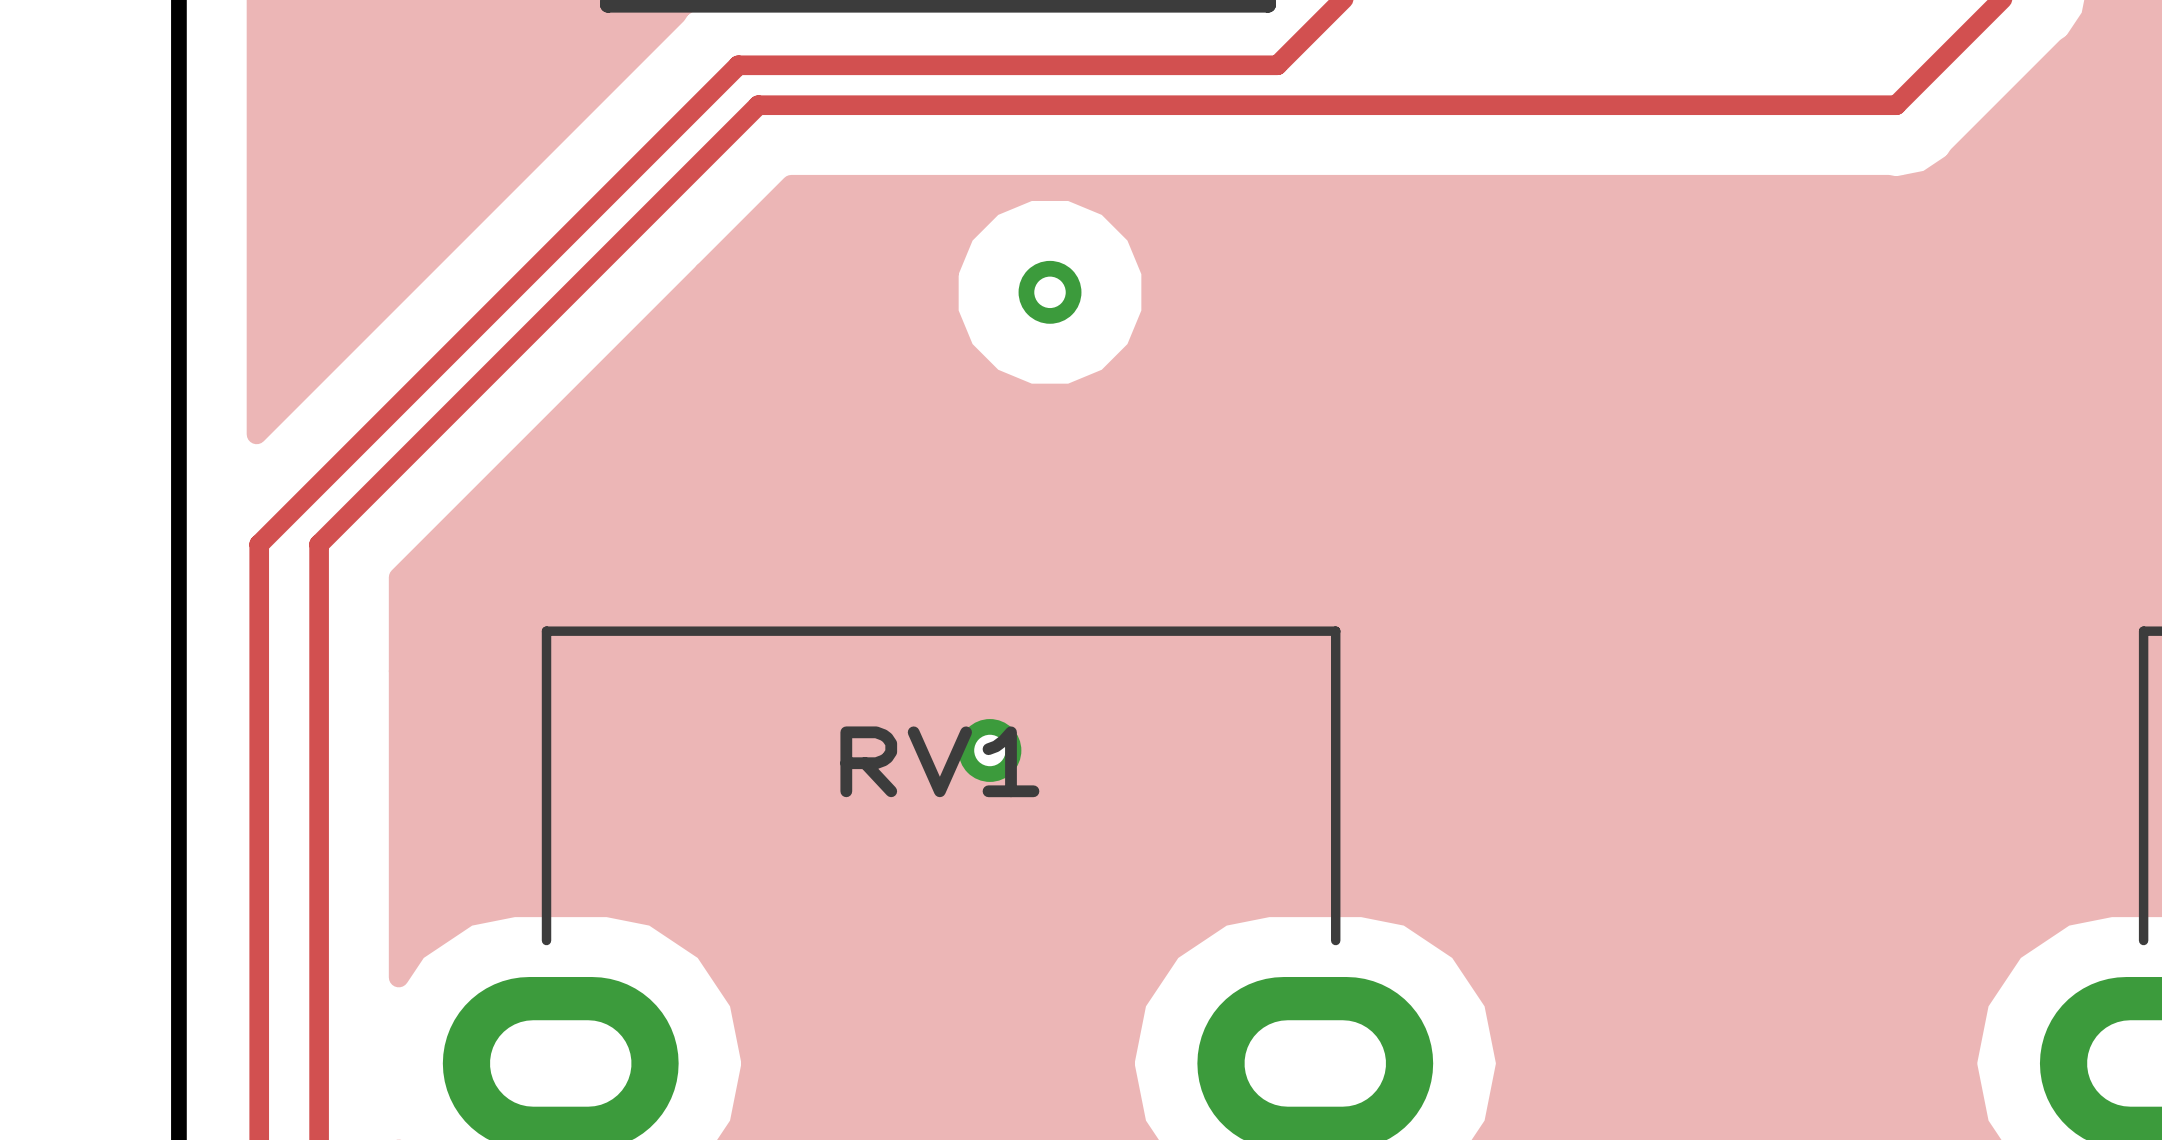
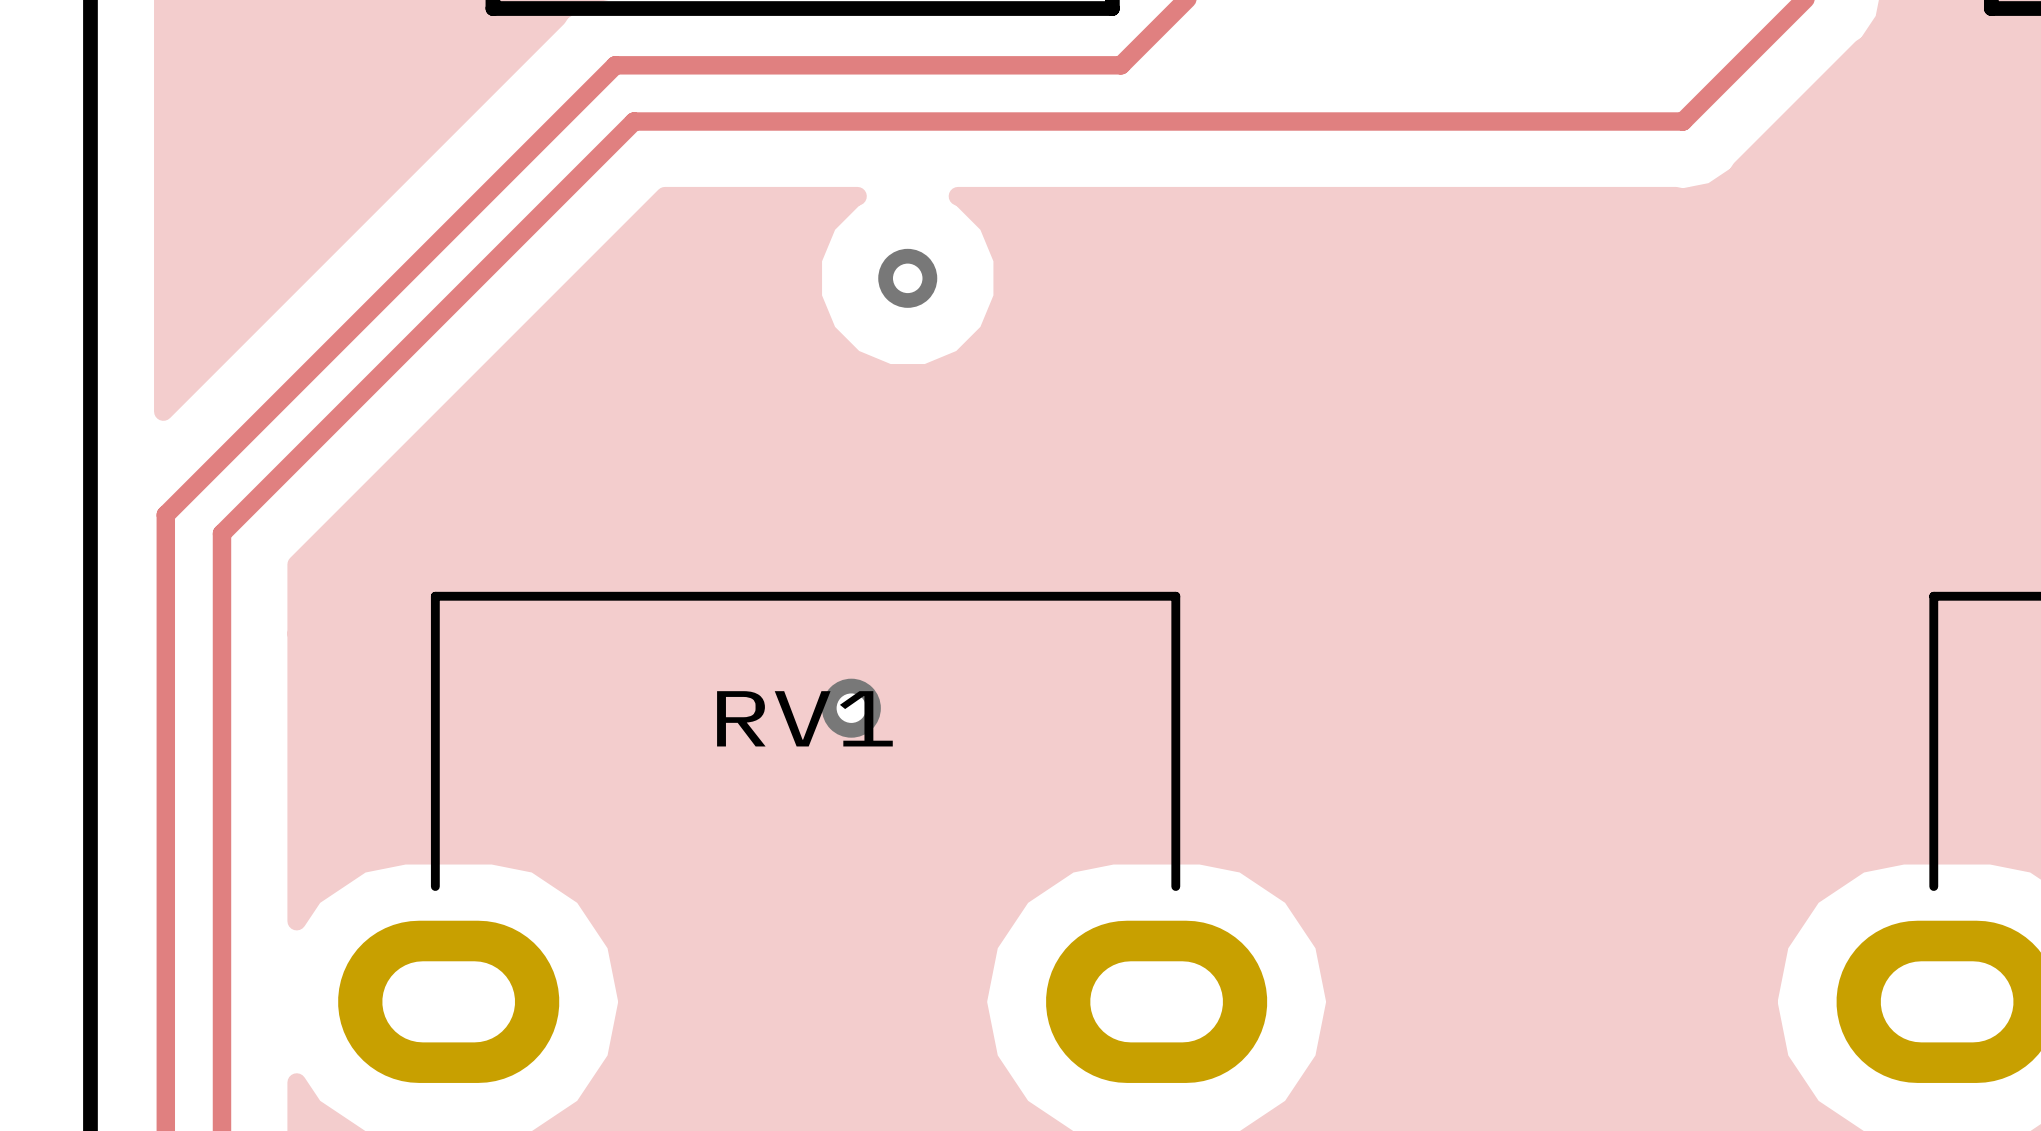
track: (1896, 105) (758, 105) (319, 544) (319, 564) -> (1701, 102) (1682, 121) (634, 121) (221, 533)

